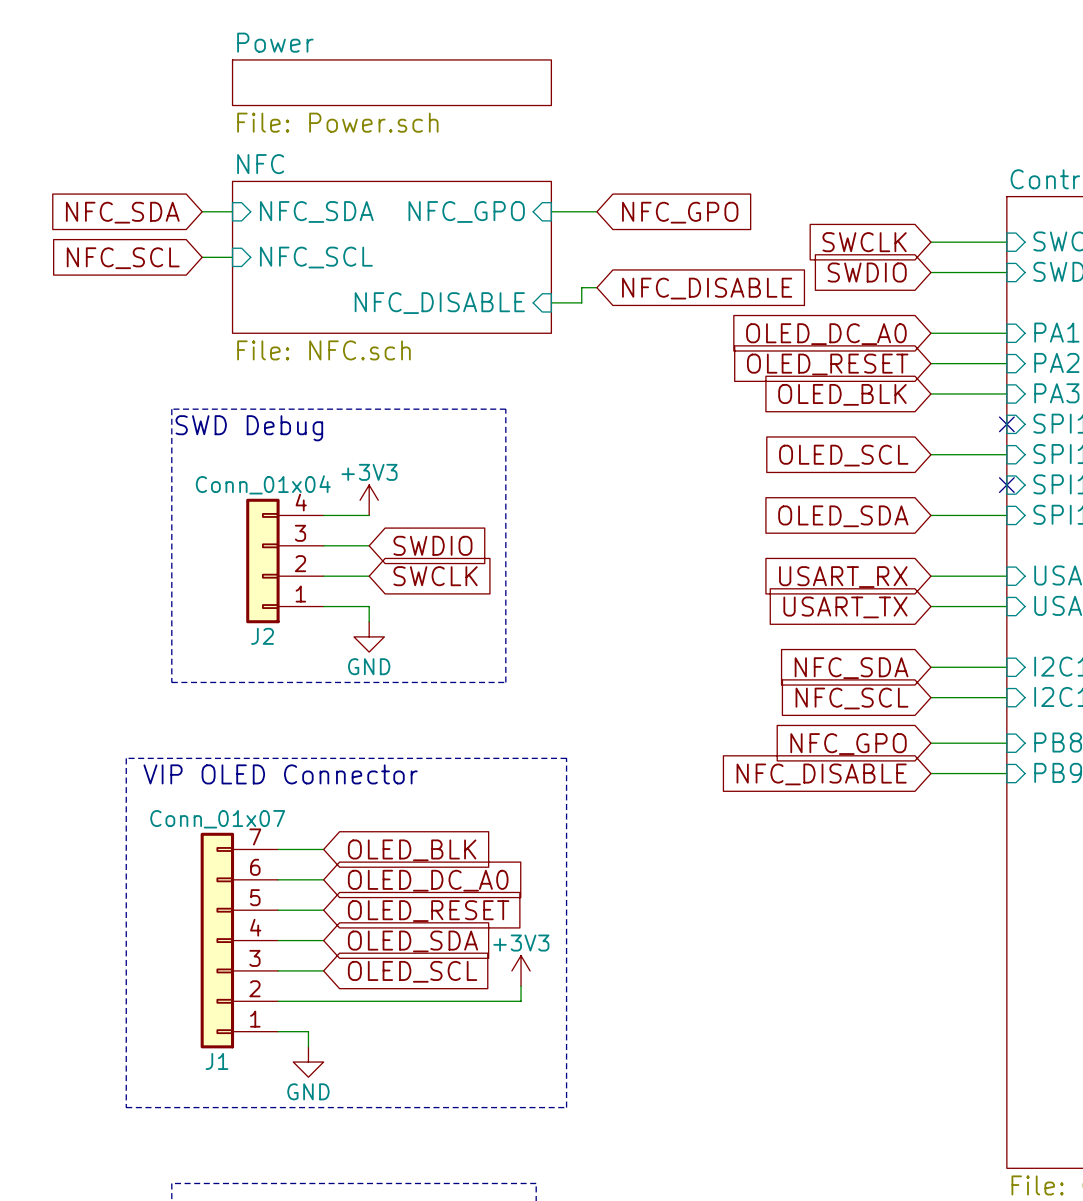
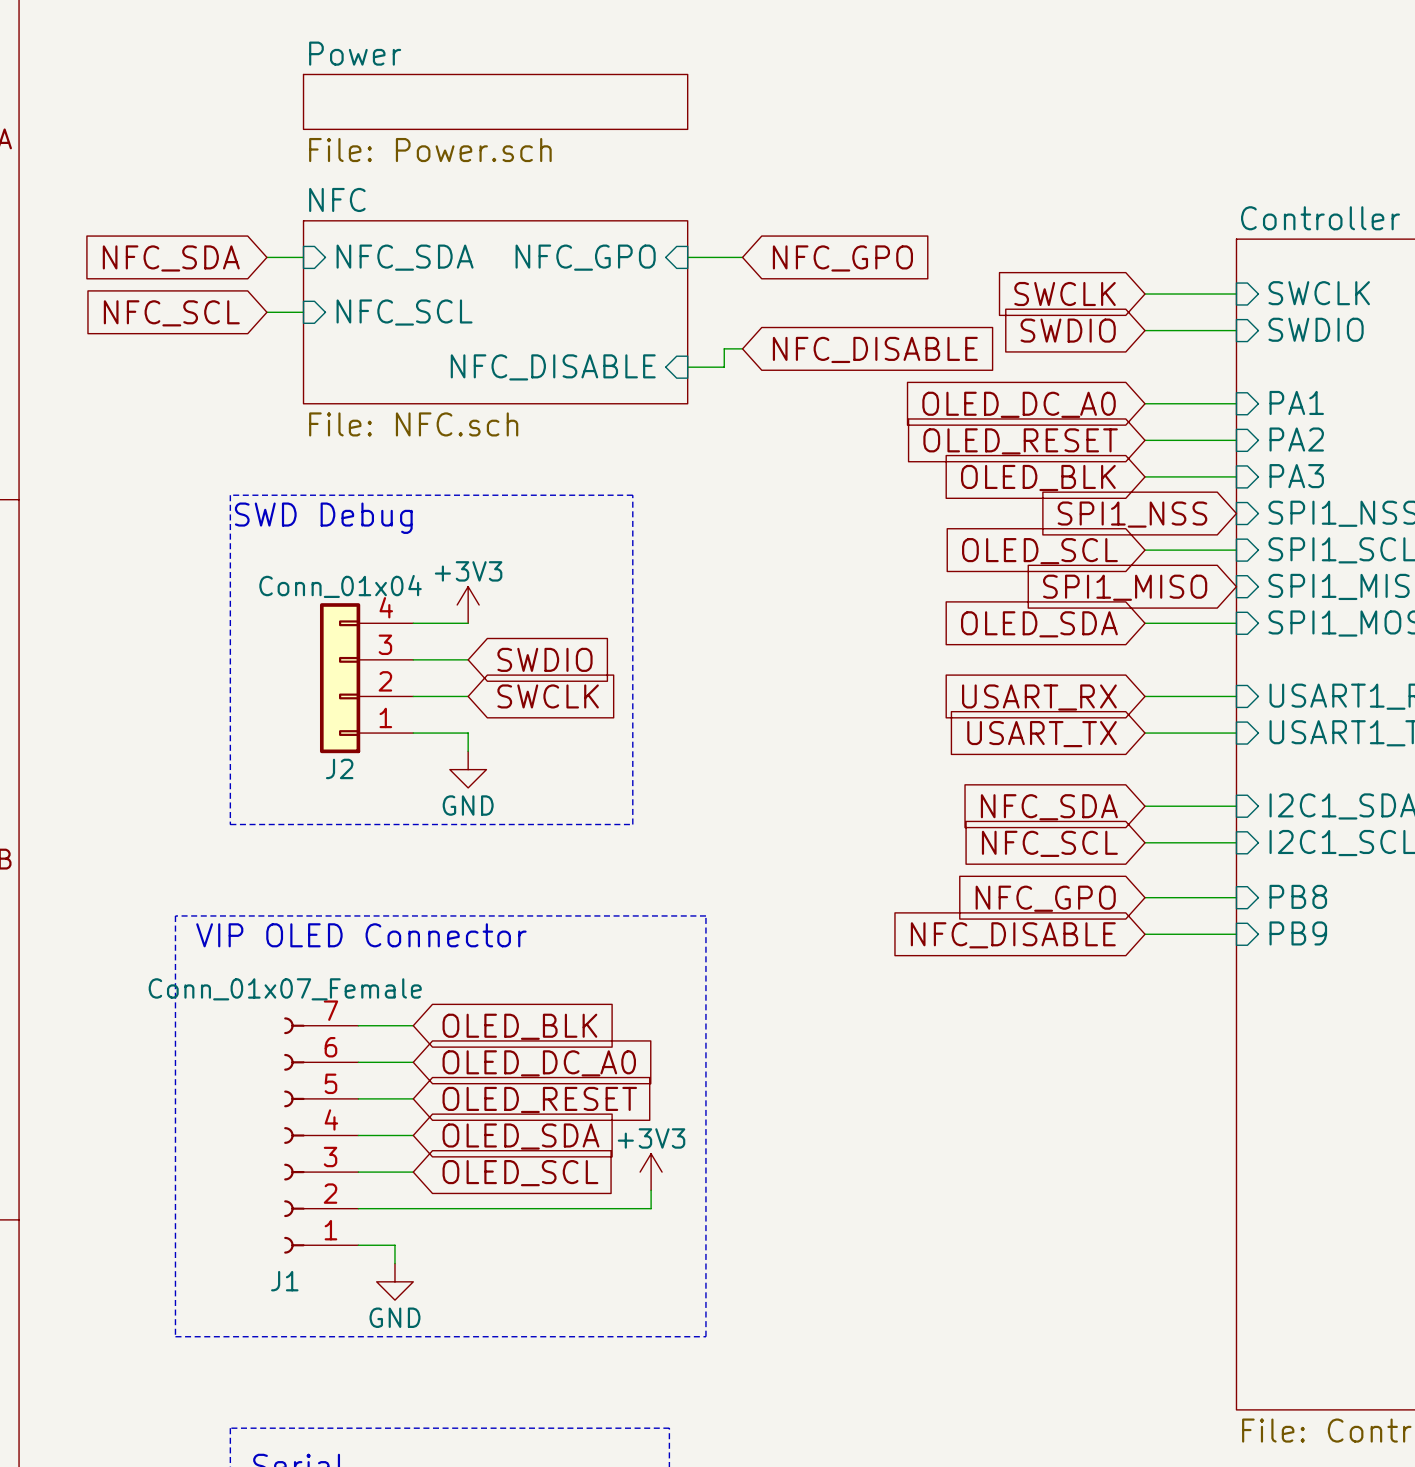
no-connect mark: (1006, 424) -> none
global label: none -> SPI1_NSS (1132, 514)
global label: none -> SPI1_MISO (1125, 587)
no-connect mark: (1006, 485) -> none
J1 value: Conn_01x07 (217, 819) -> Conn_01x07_Female (285, 989)
J1 symbol: [200, 832, 279, 1049] -> [284, 1017, 359, 1254]

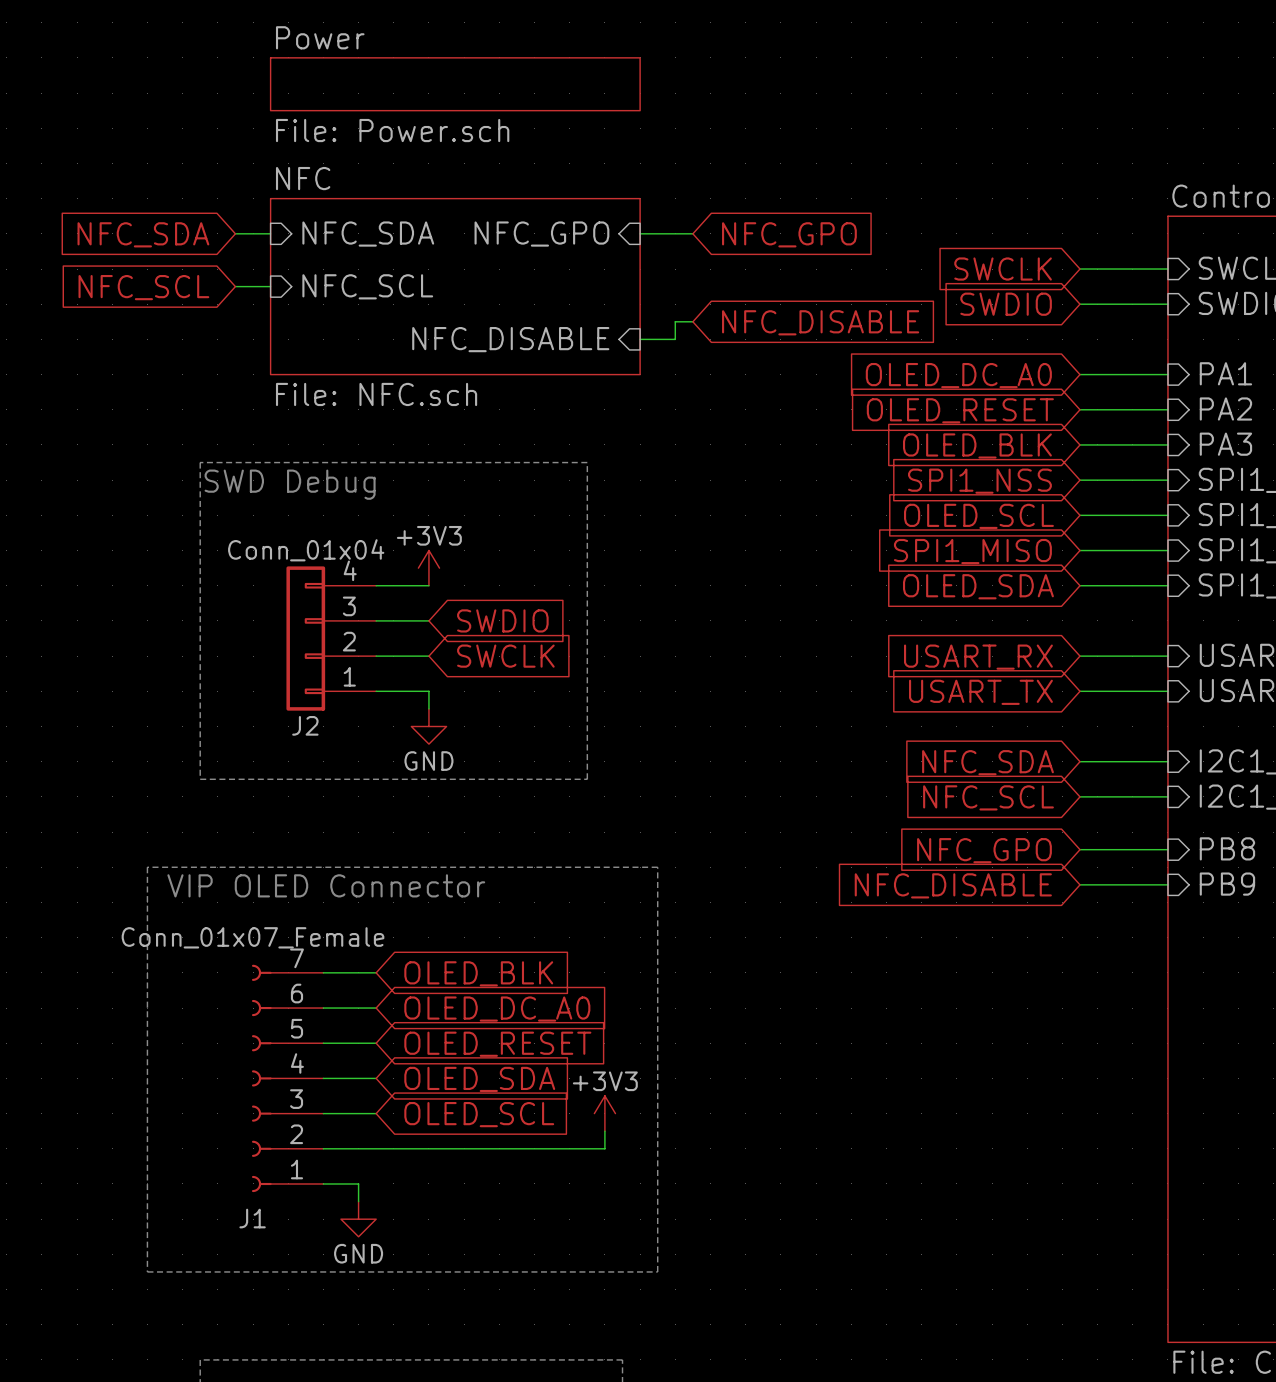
wire: none -> (1080, 480) (1167, 480)
global label position: SPI1_NSS (1132, 514) -> SPI1_NSS (979, 481)
wire: none -> (1080, 550) (1167, 550)
global label position: SPI1_MISO (1125, 587) -> SPI1_MISO (972, 551)

